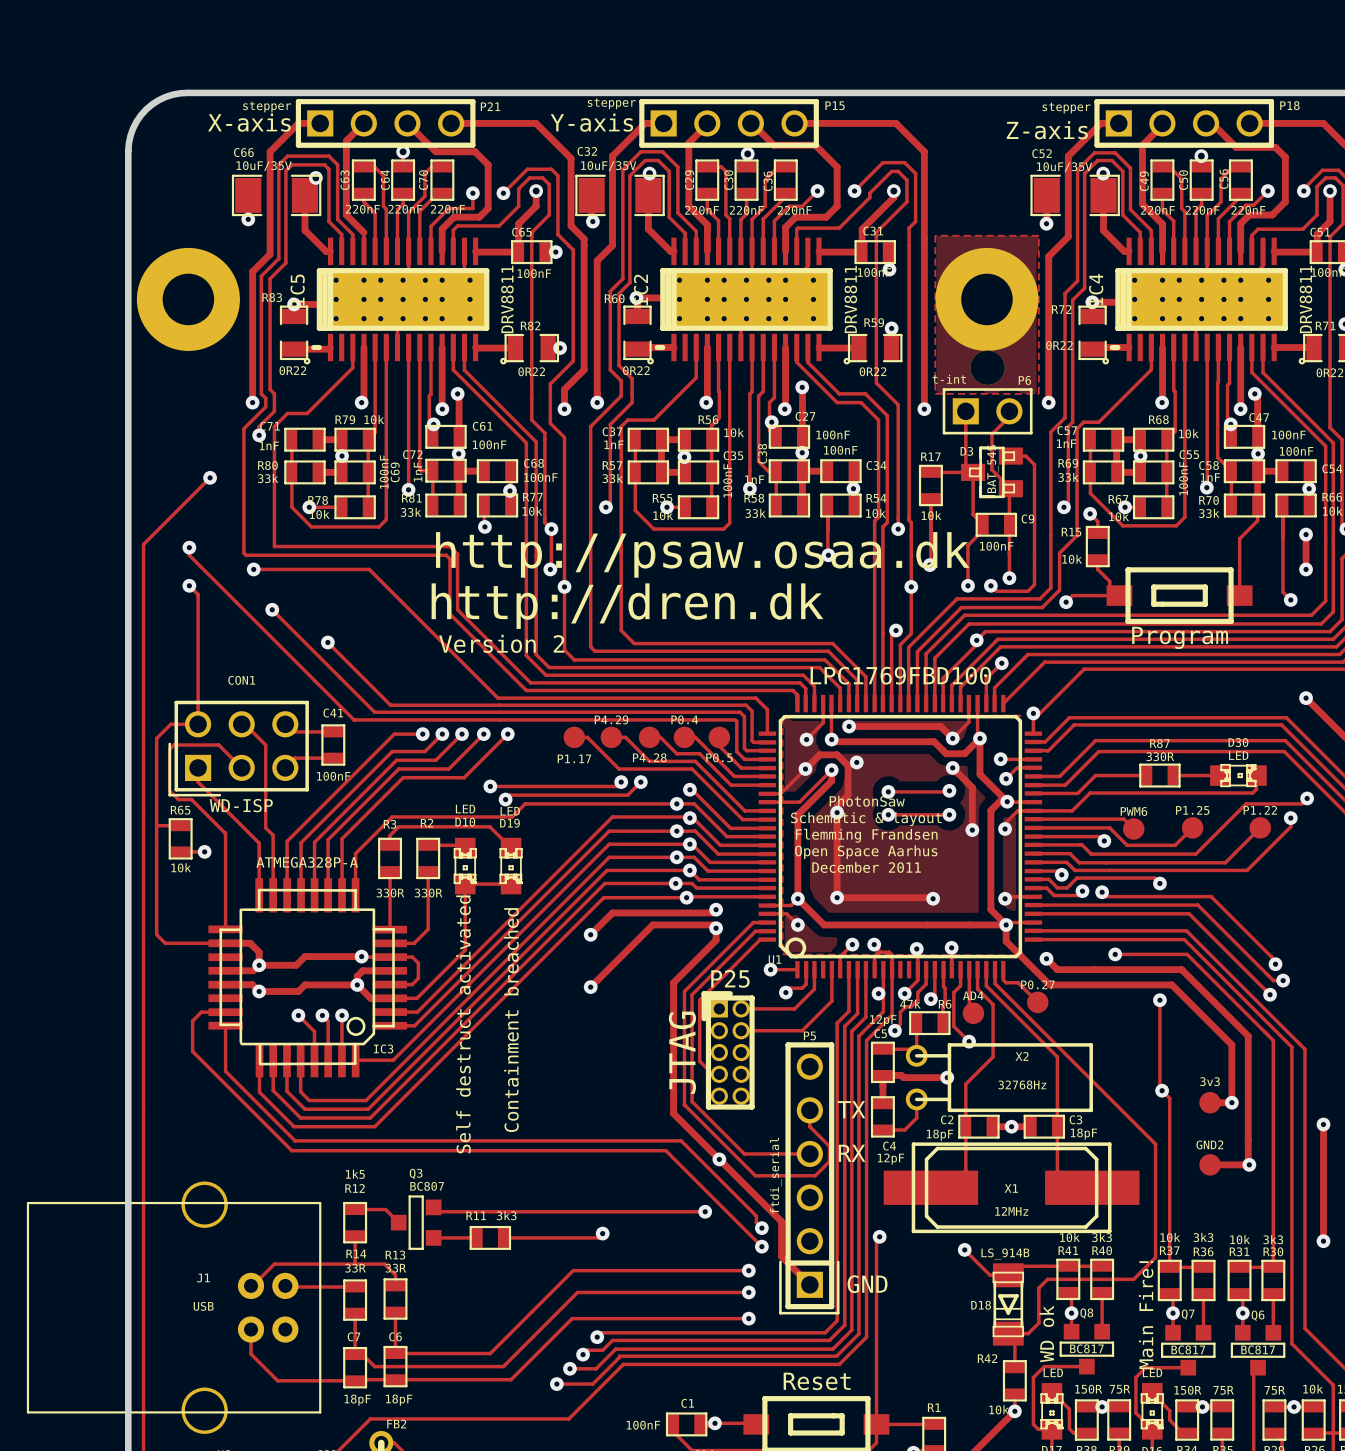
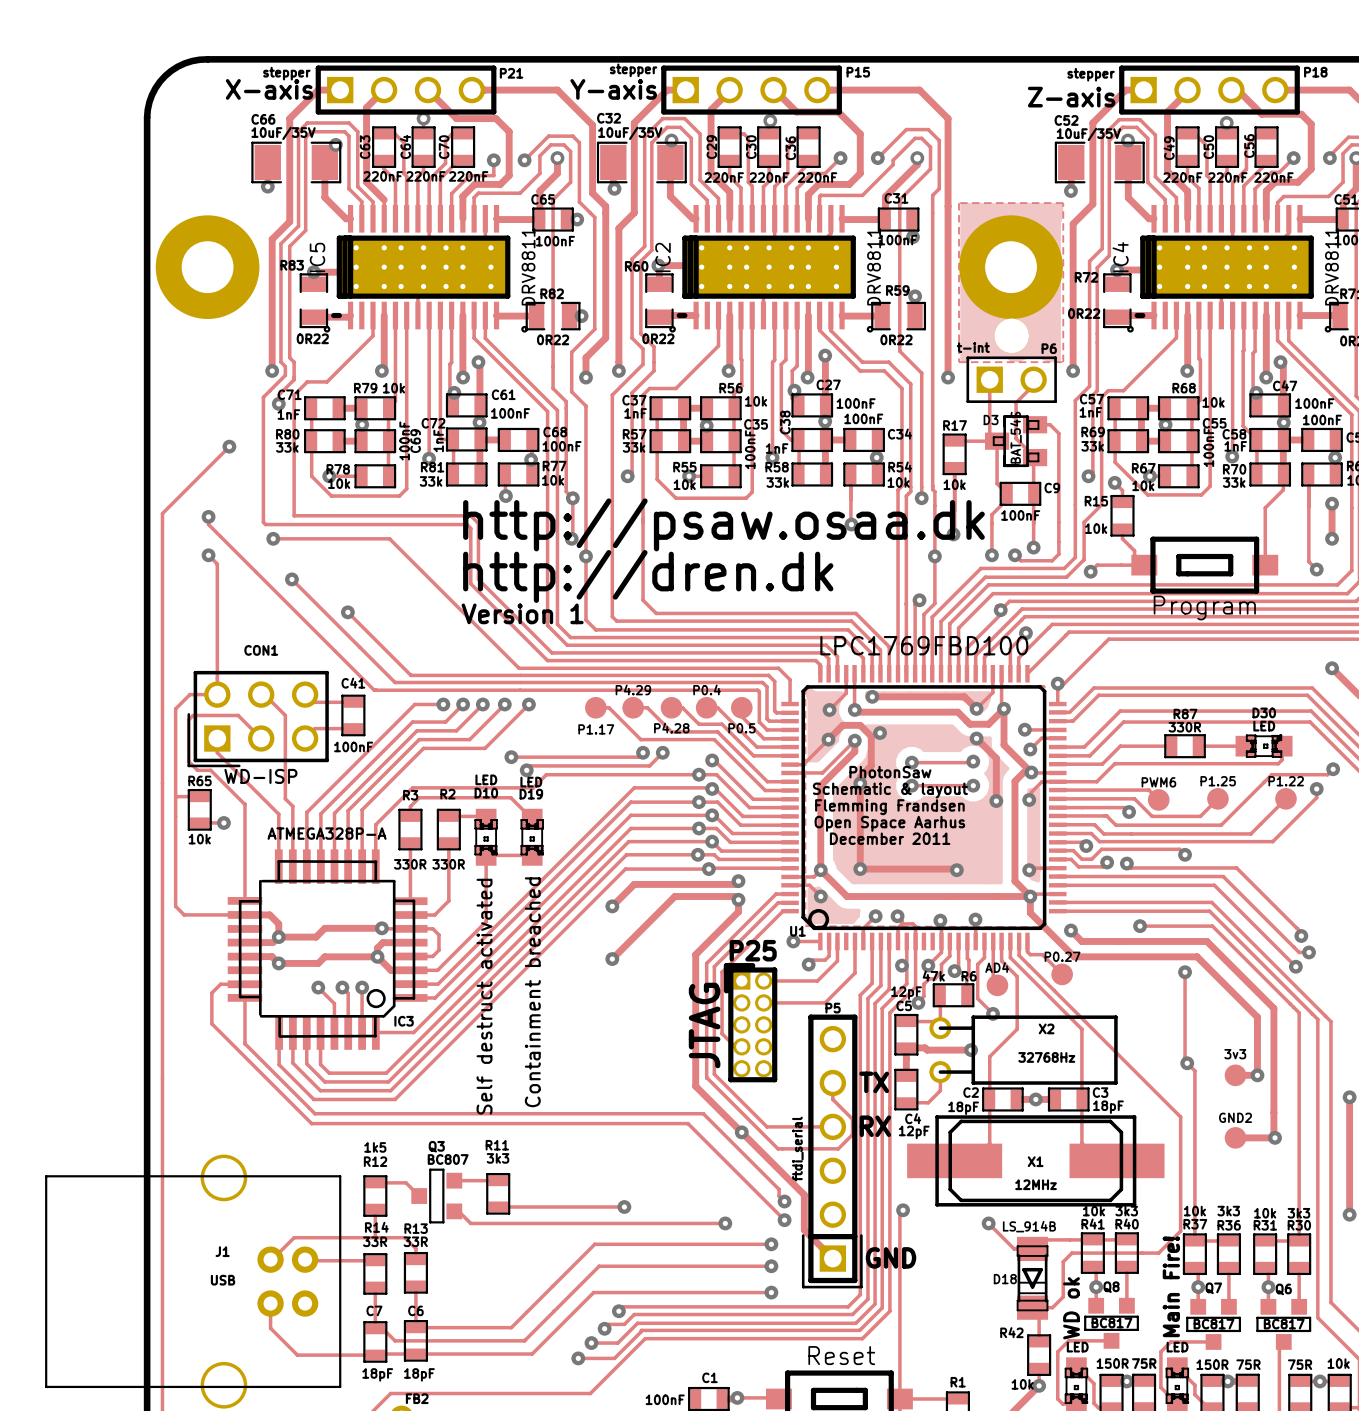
text: Version 2 (501, 643) -> Version 1 (522, 613)
track: (433, 1207) (438, 1211) (705, 1211) -> (454, 1180) (498, 1180)
via position: (705, 1211) -> (725, 1223)
track: (602, 1233) (598, 1237) (503, 1237) -> (624, 1207) (498, 1207)
track: (438, 1237) (477, 1237) -> (458, 1211) (470, 1223) (725, 1223)
R11 rotation: 0° (490, 1237) -> 90° clockwise (498, 1193)

